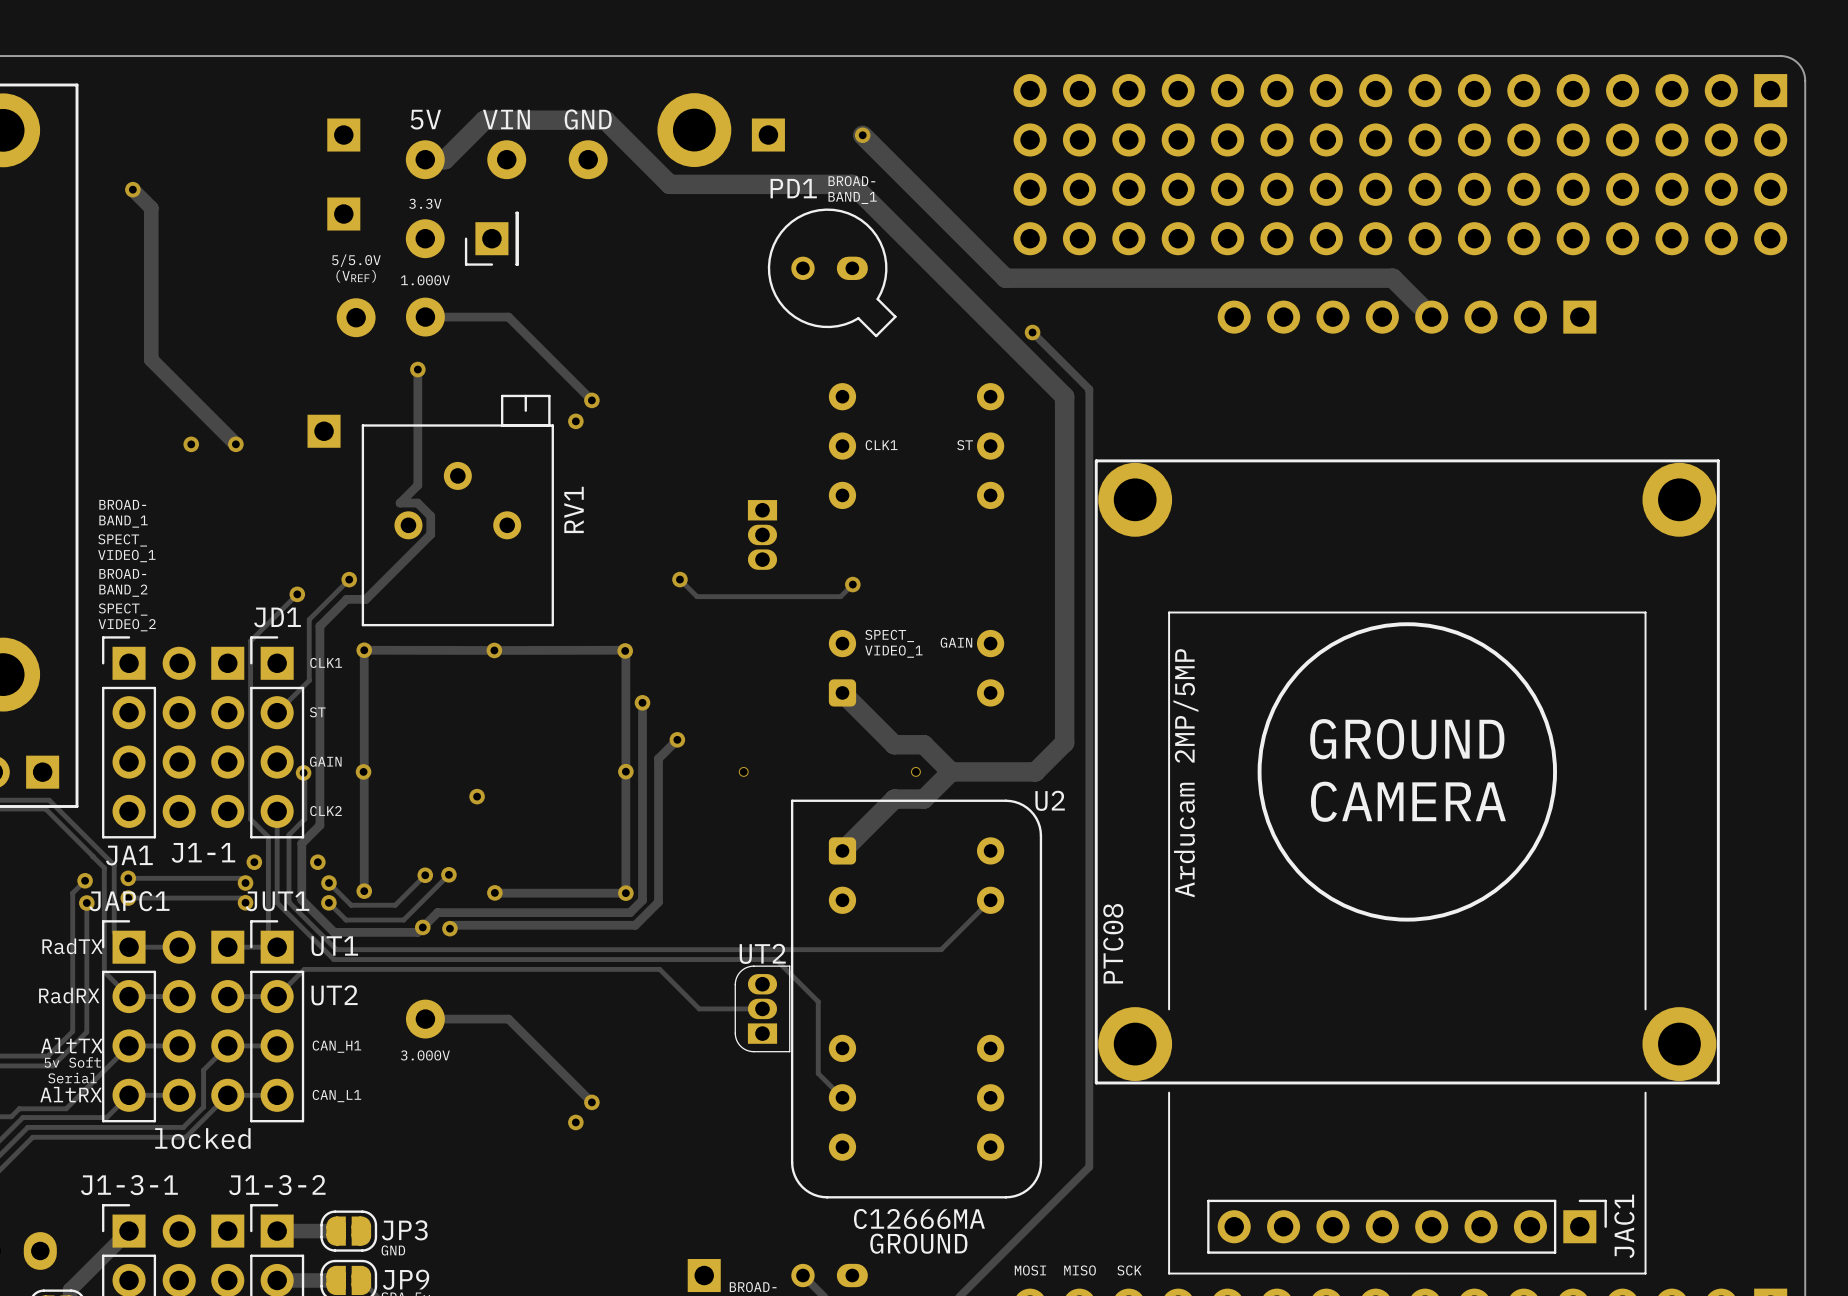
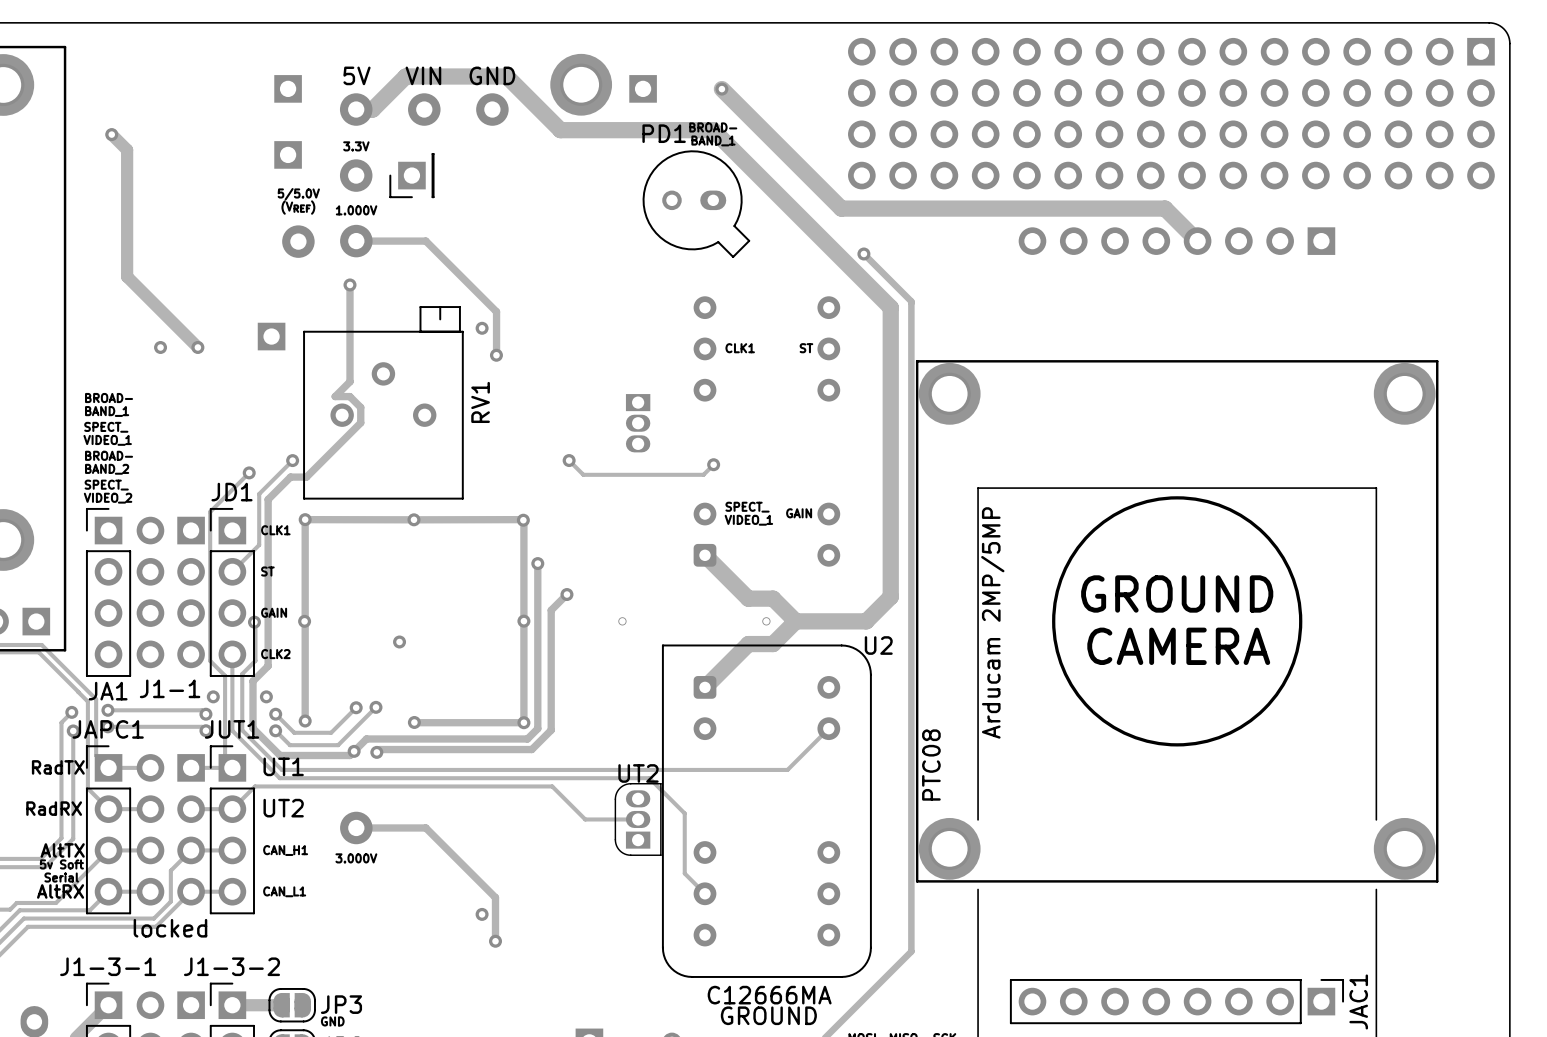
track: none -> (495, 310) (496, 355)
via position: (591, 400) -> (496, 355)
track: none -> (495, 897) (495, 941)
via position: (591, 1102) -> (495, 941)

